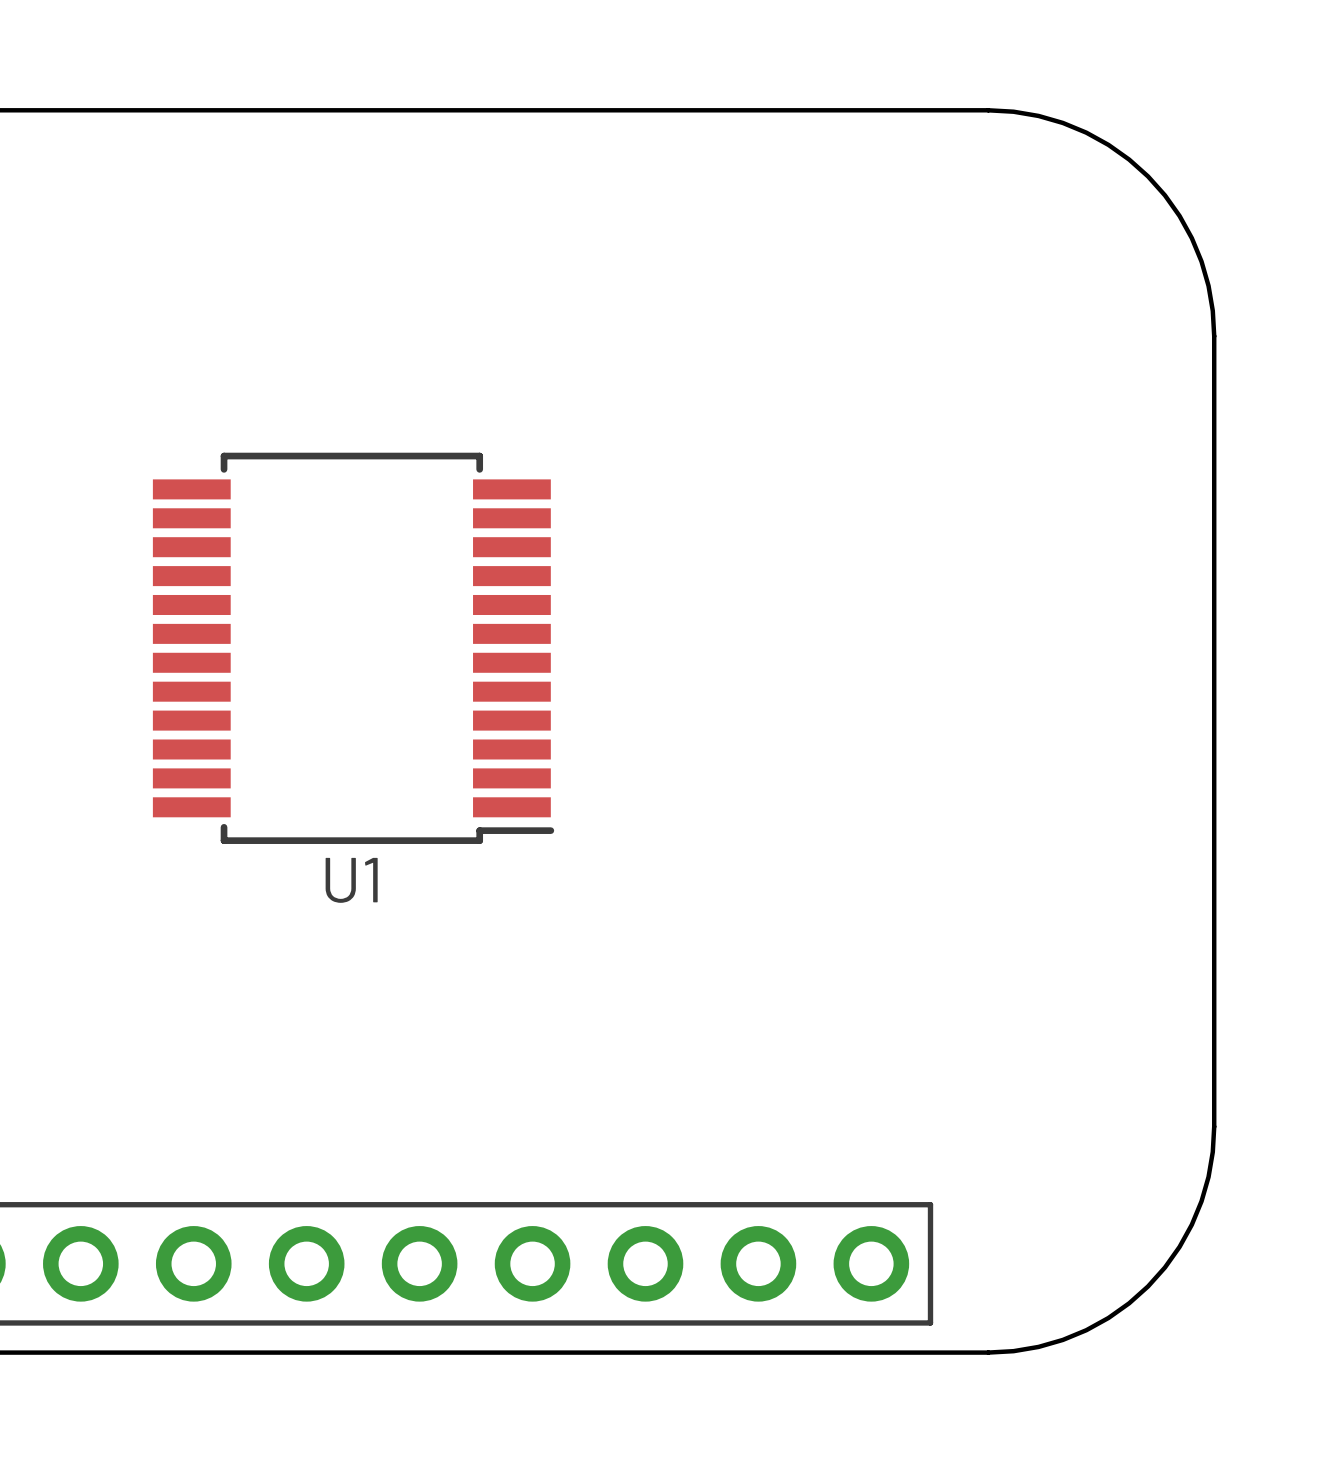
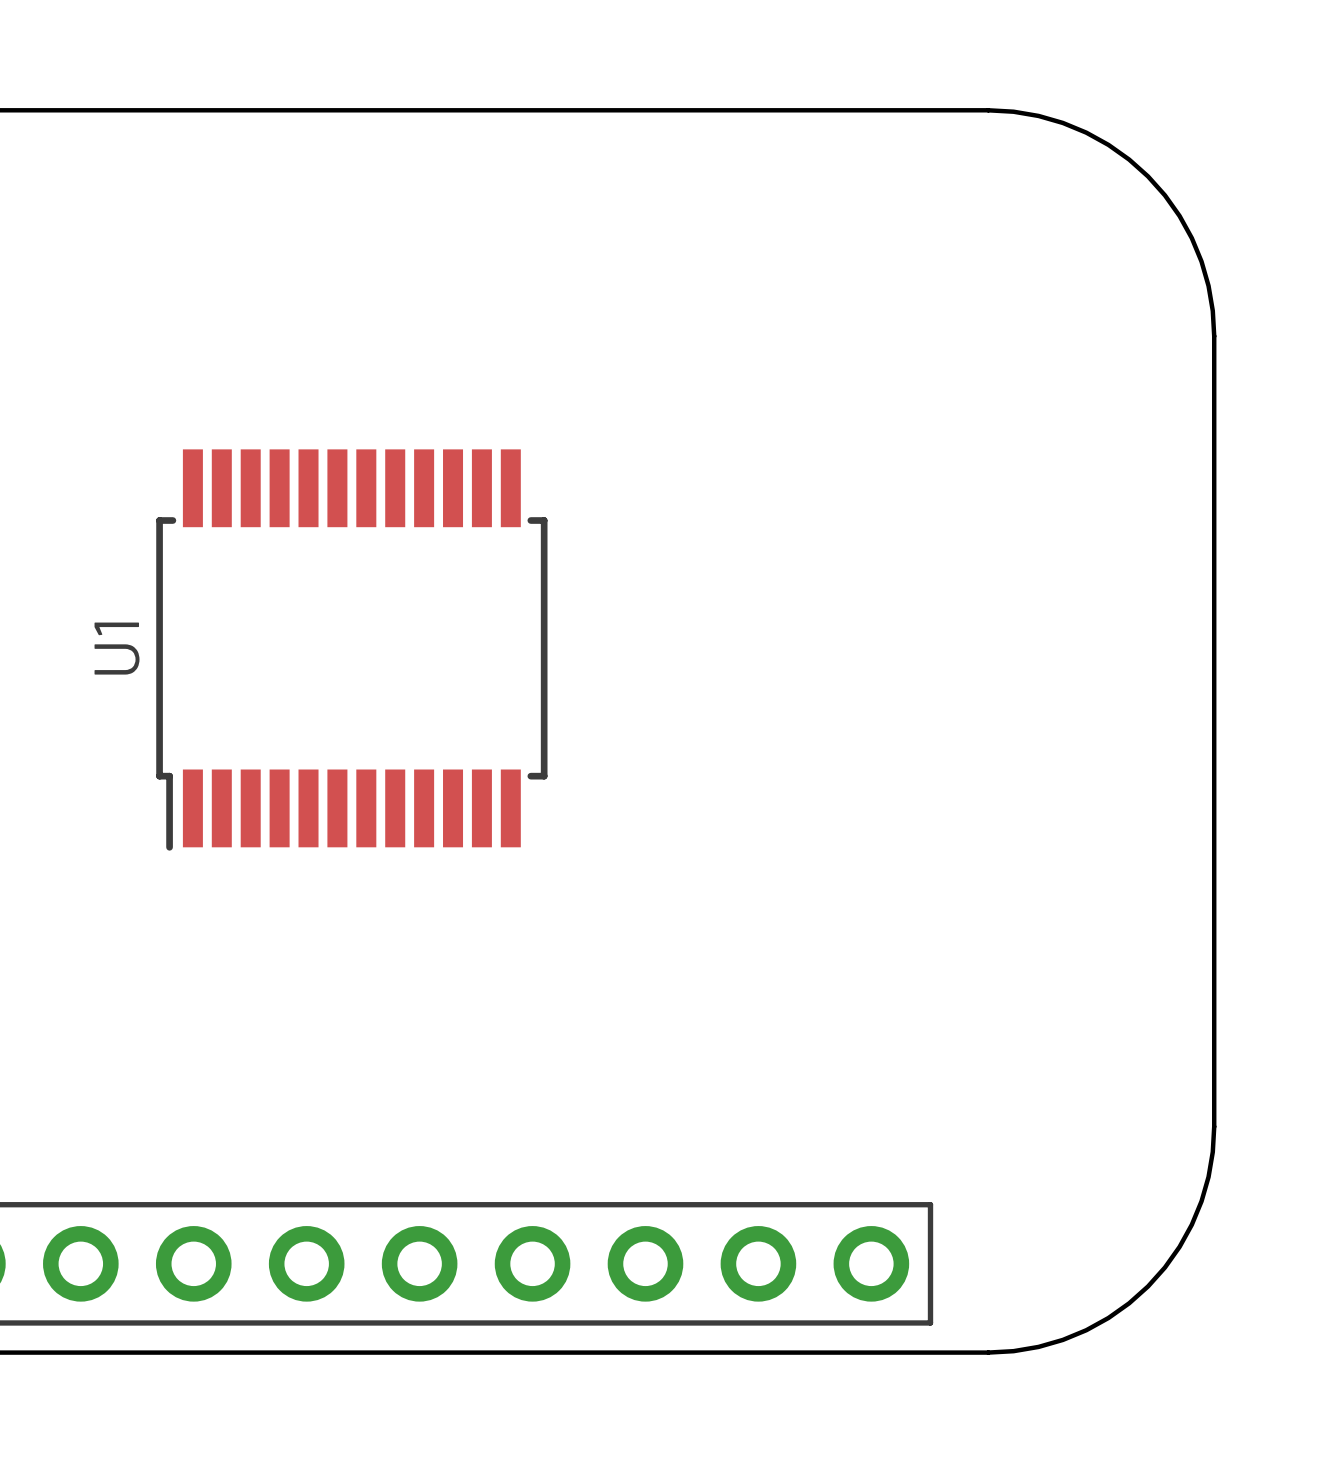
U1 rotation: 0° (353, 648) -> 90° clockwise (351, 650)

